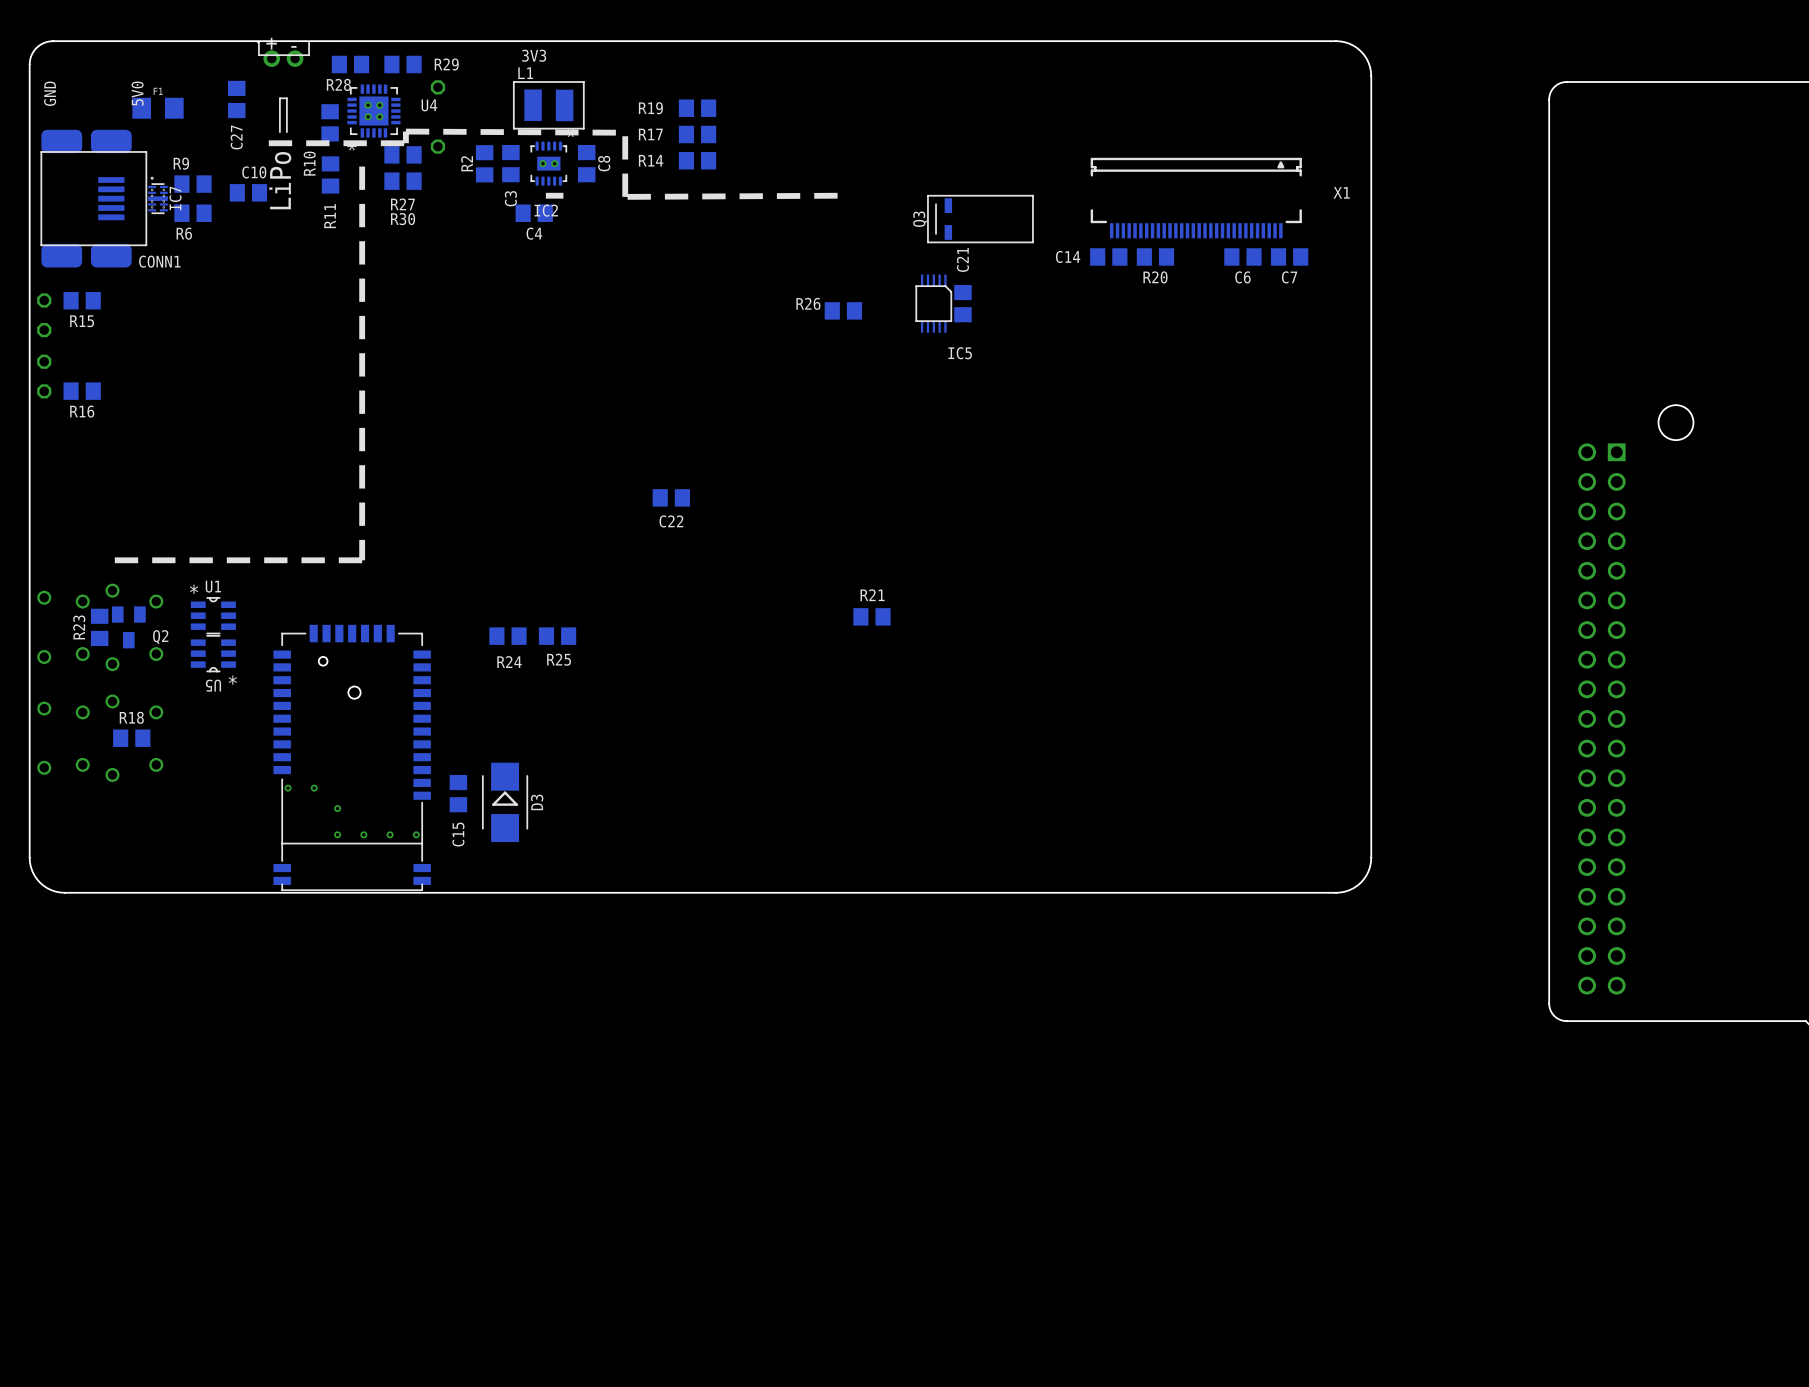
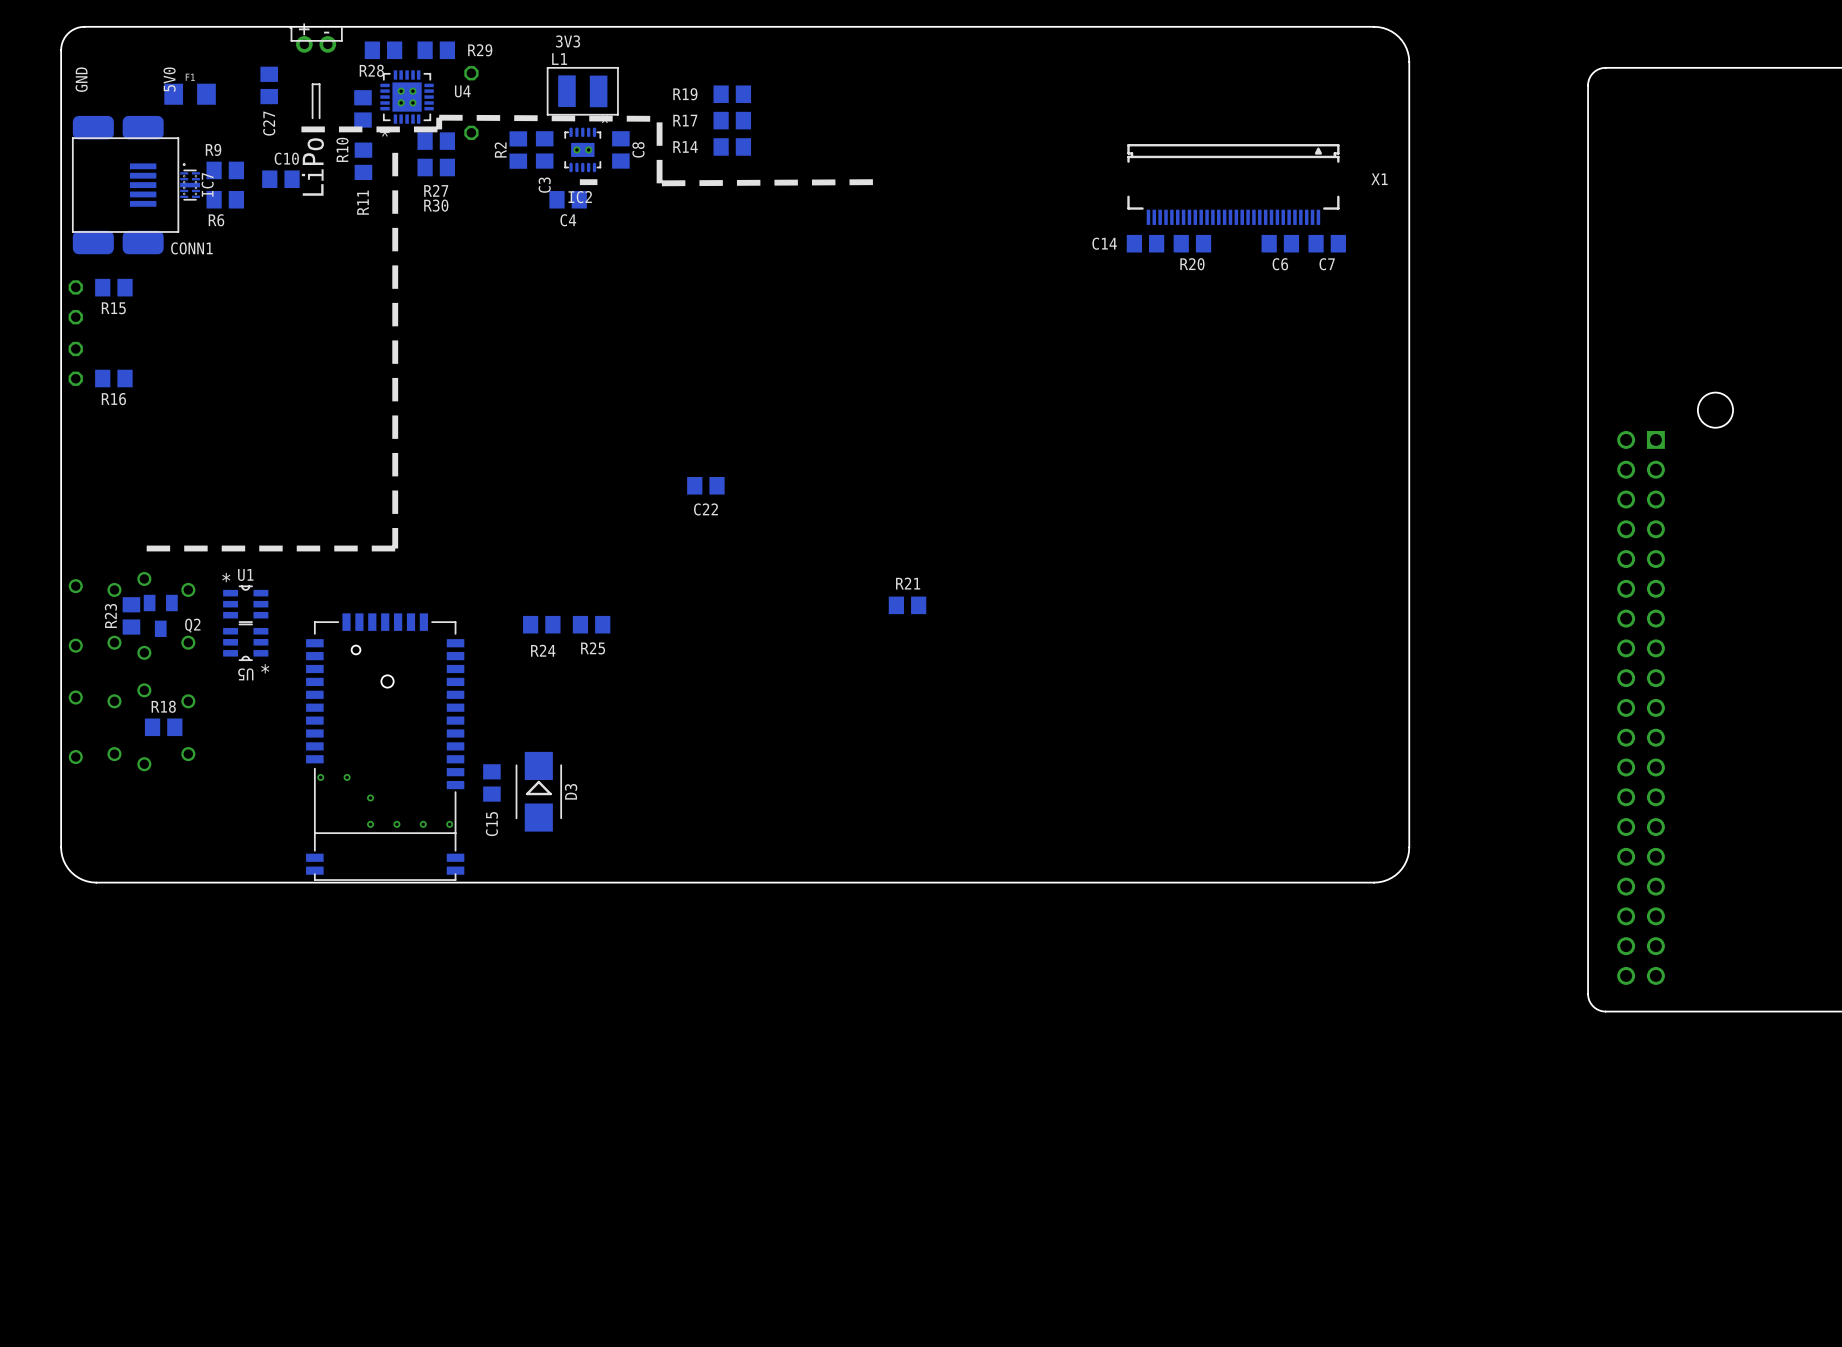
Q3: (980, 219) -> none
IC5: (933, 303) -> none
C21: (962, 303) -> none
R26: (843, 310) -> none

